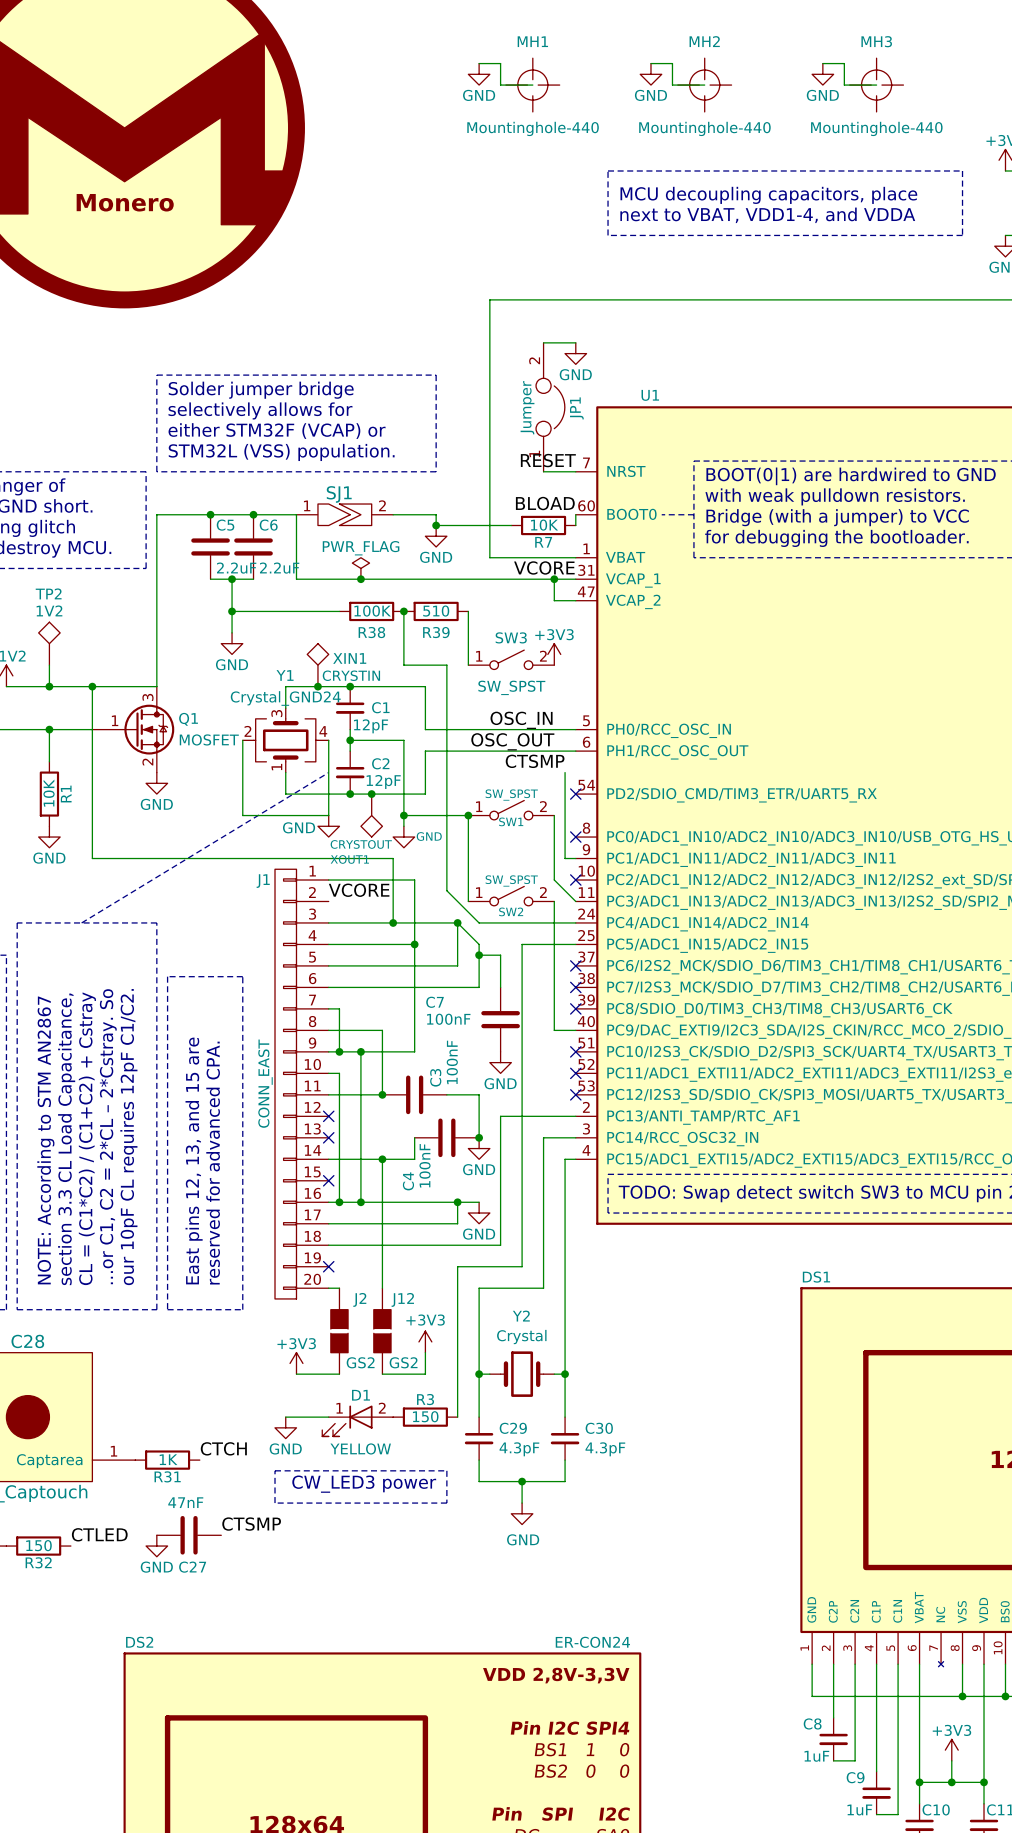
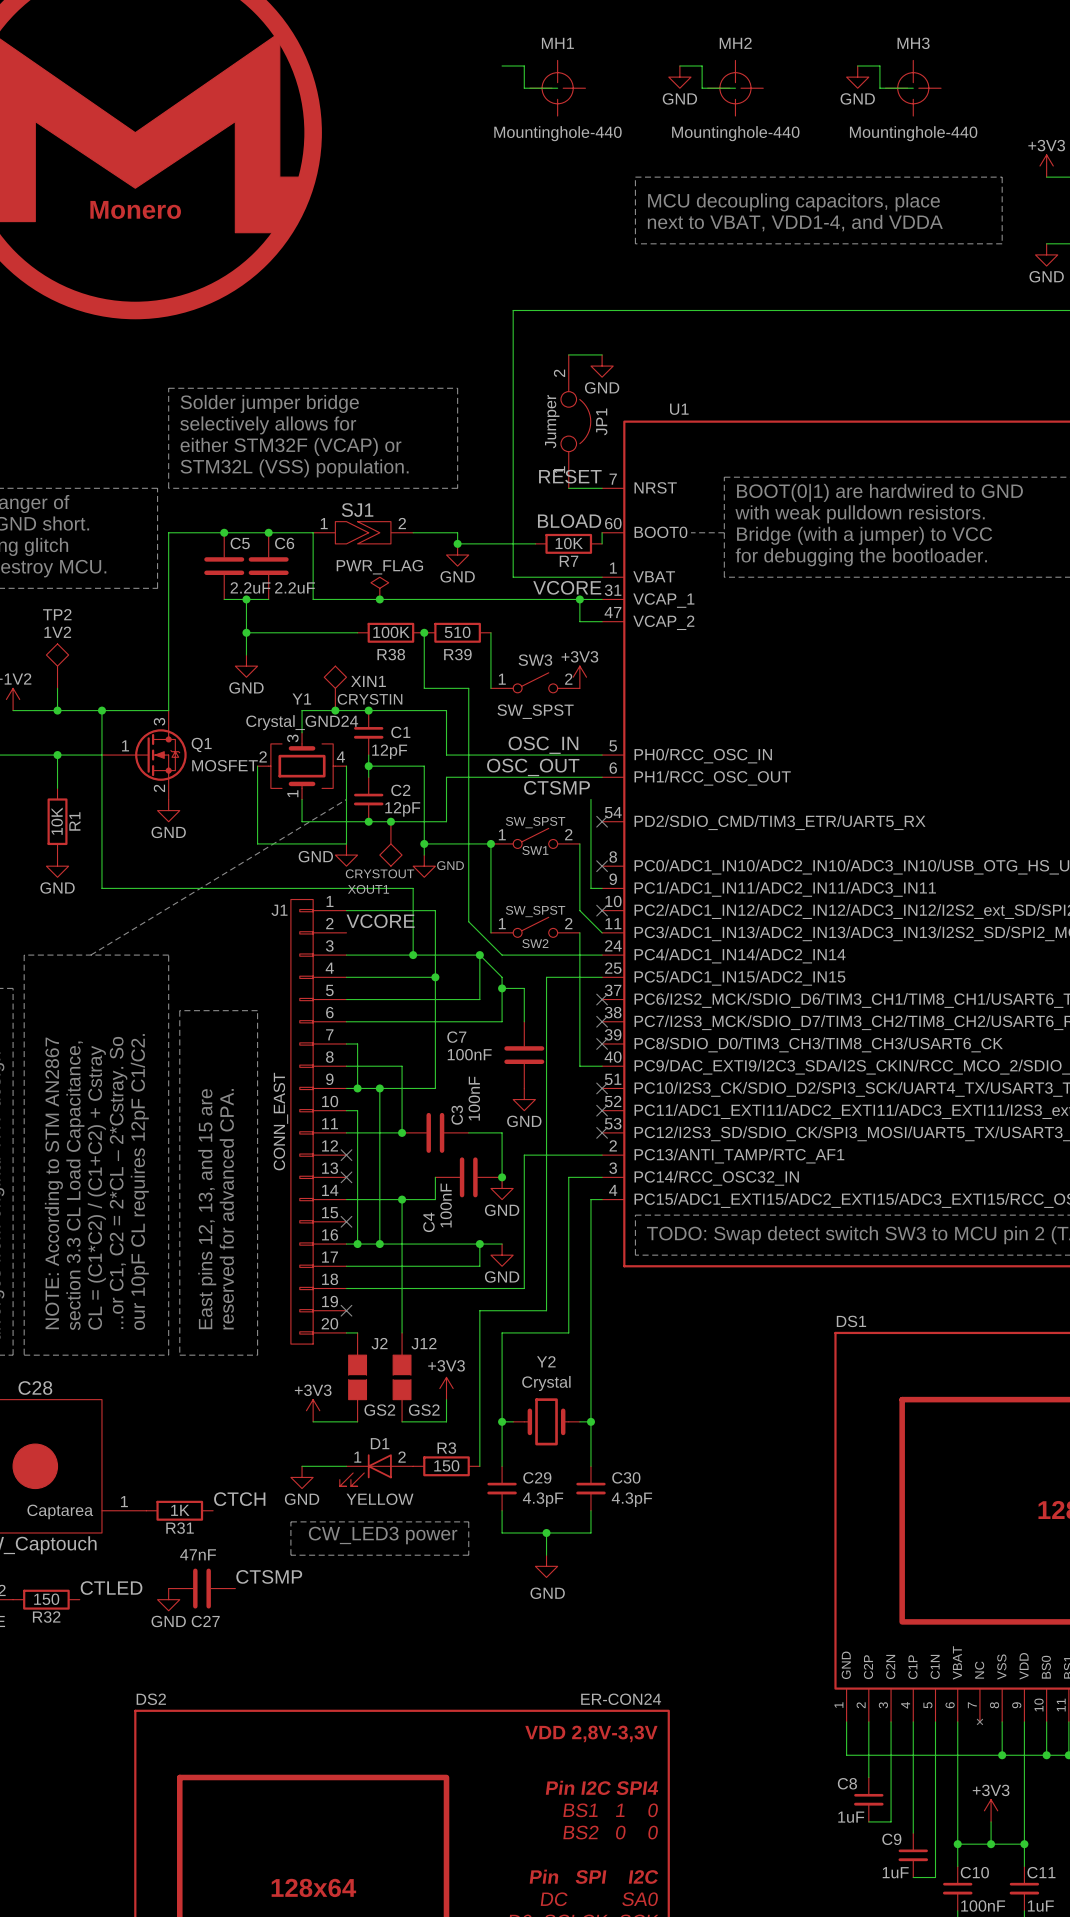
power symbol: GND (479, 74) -> none

